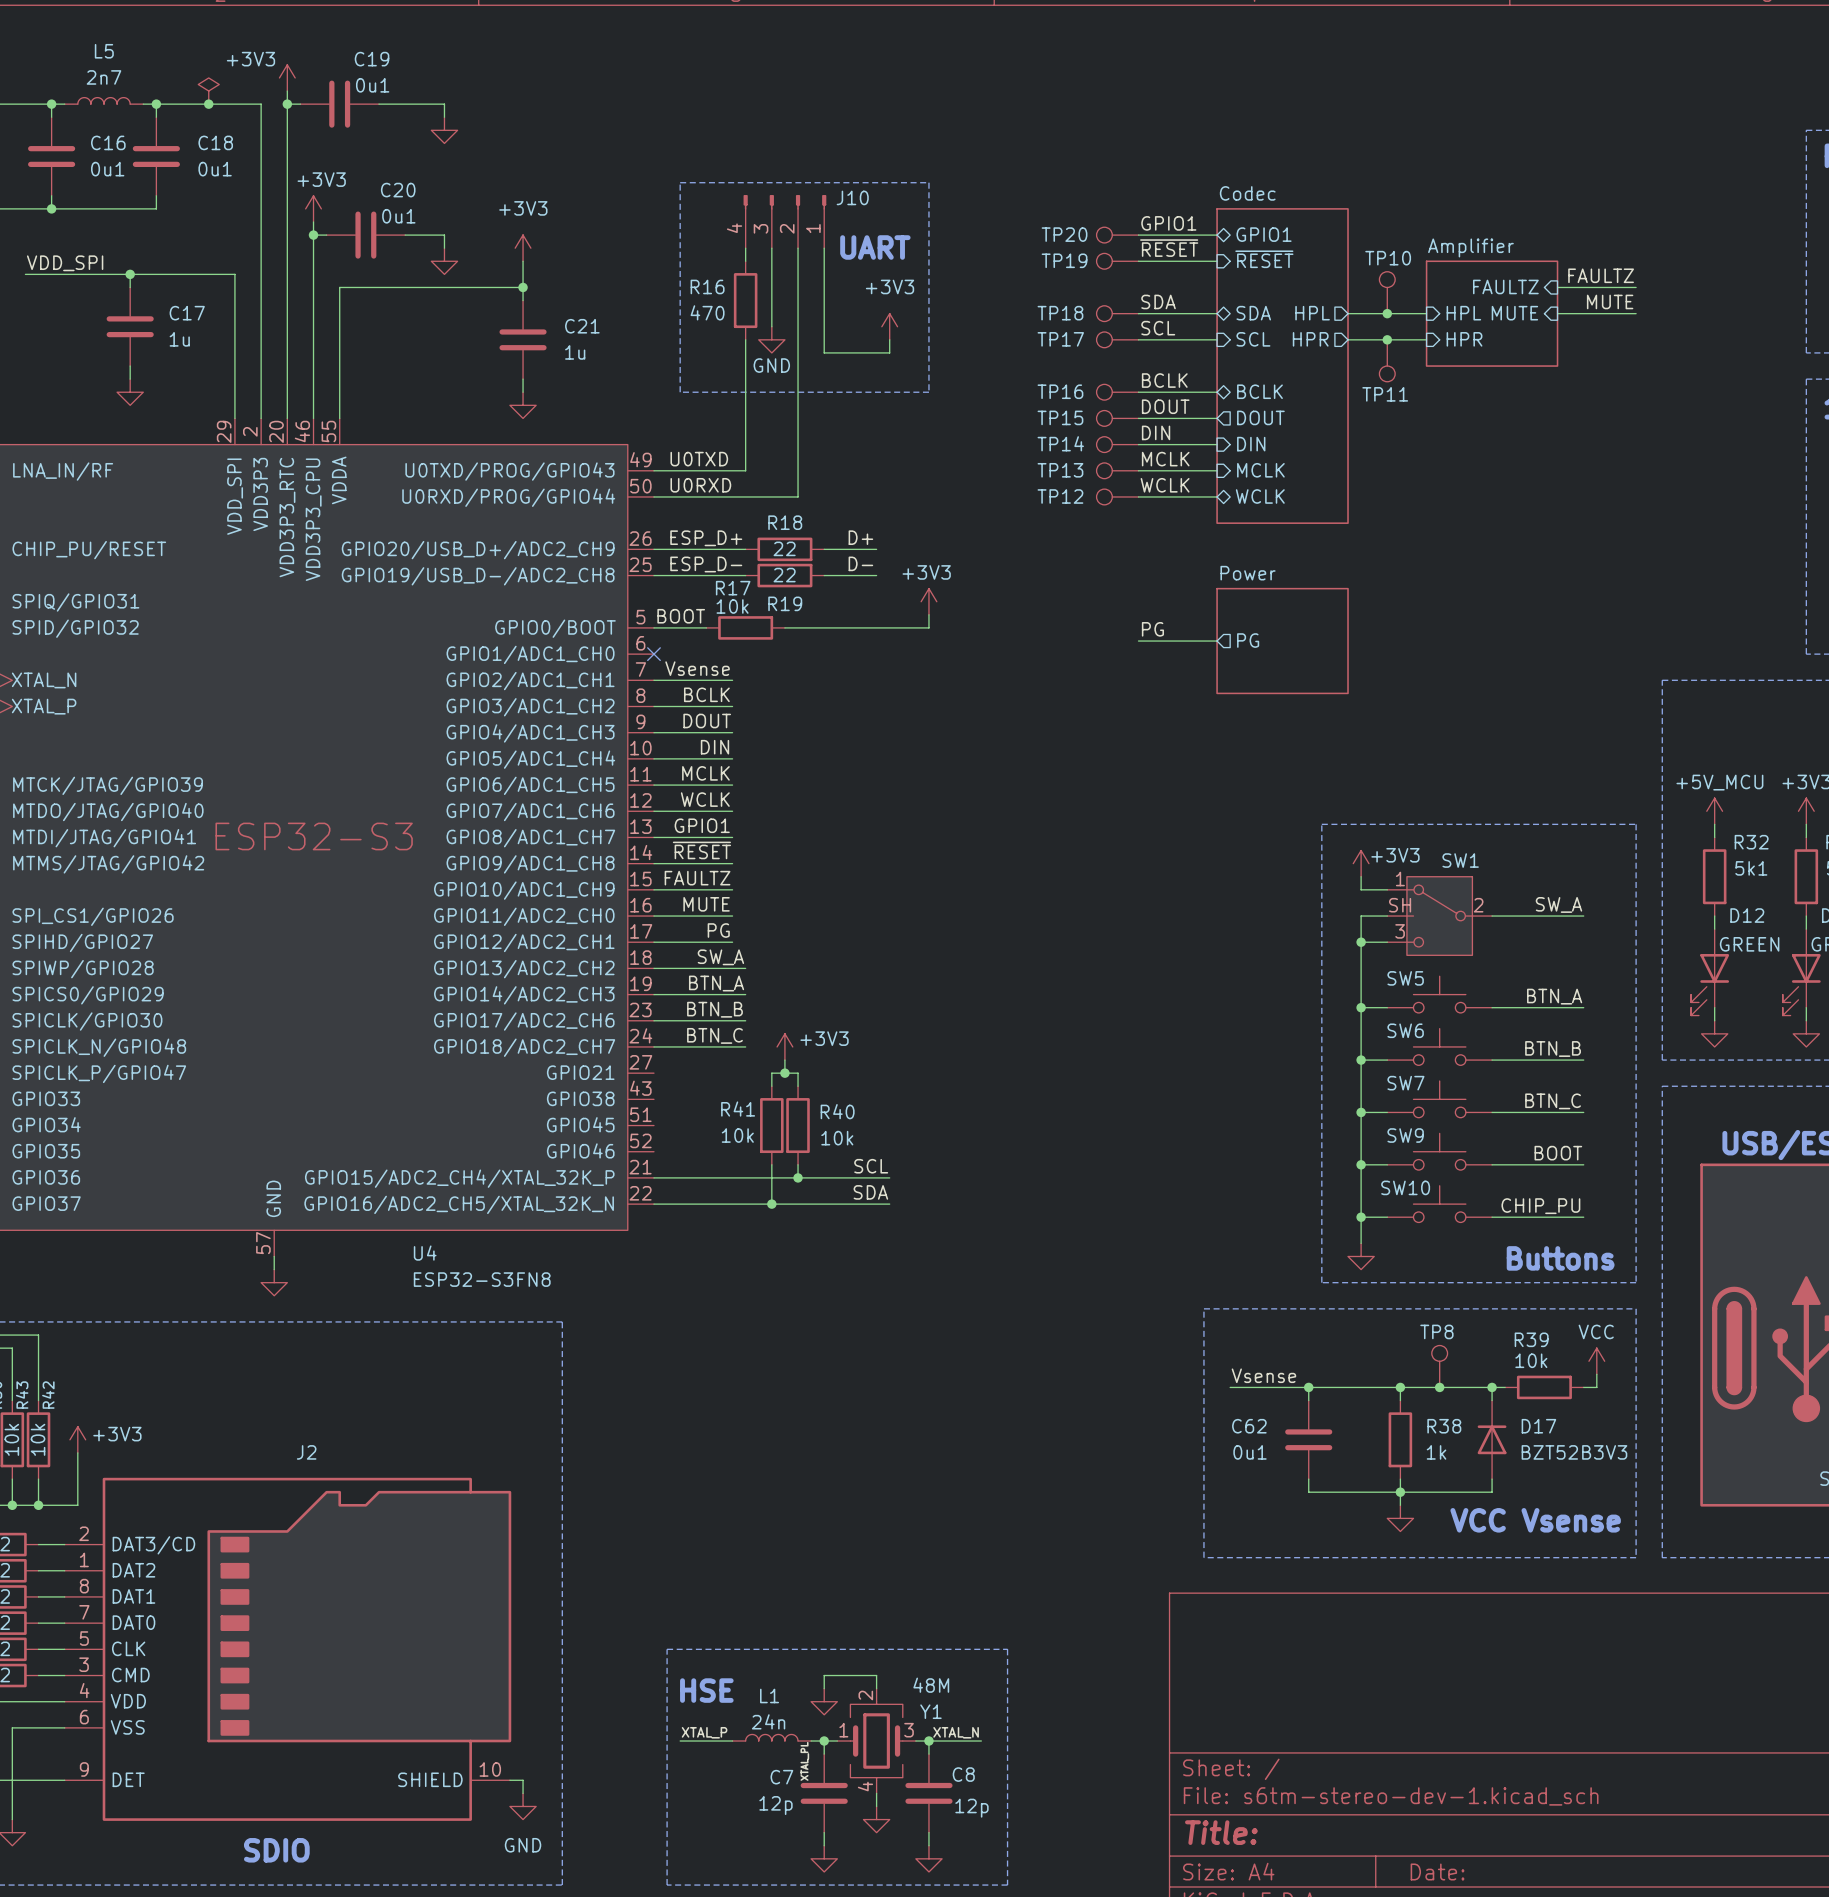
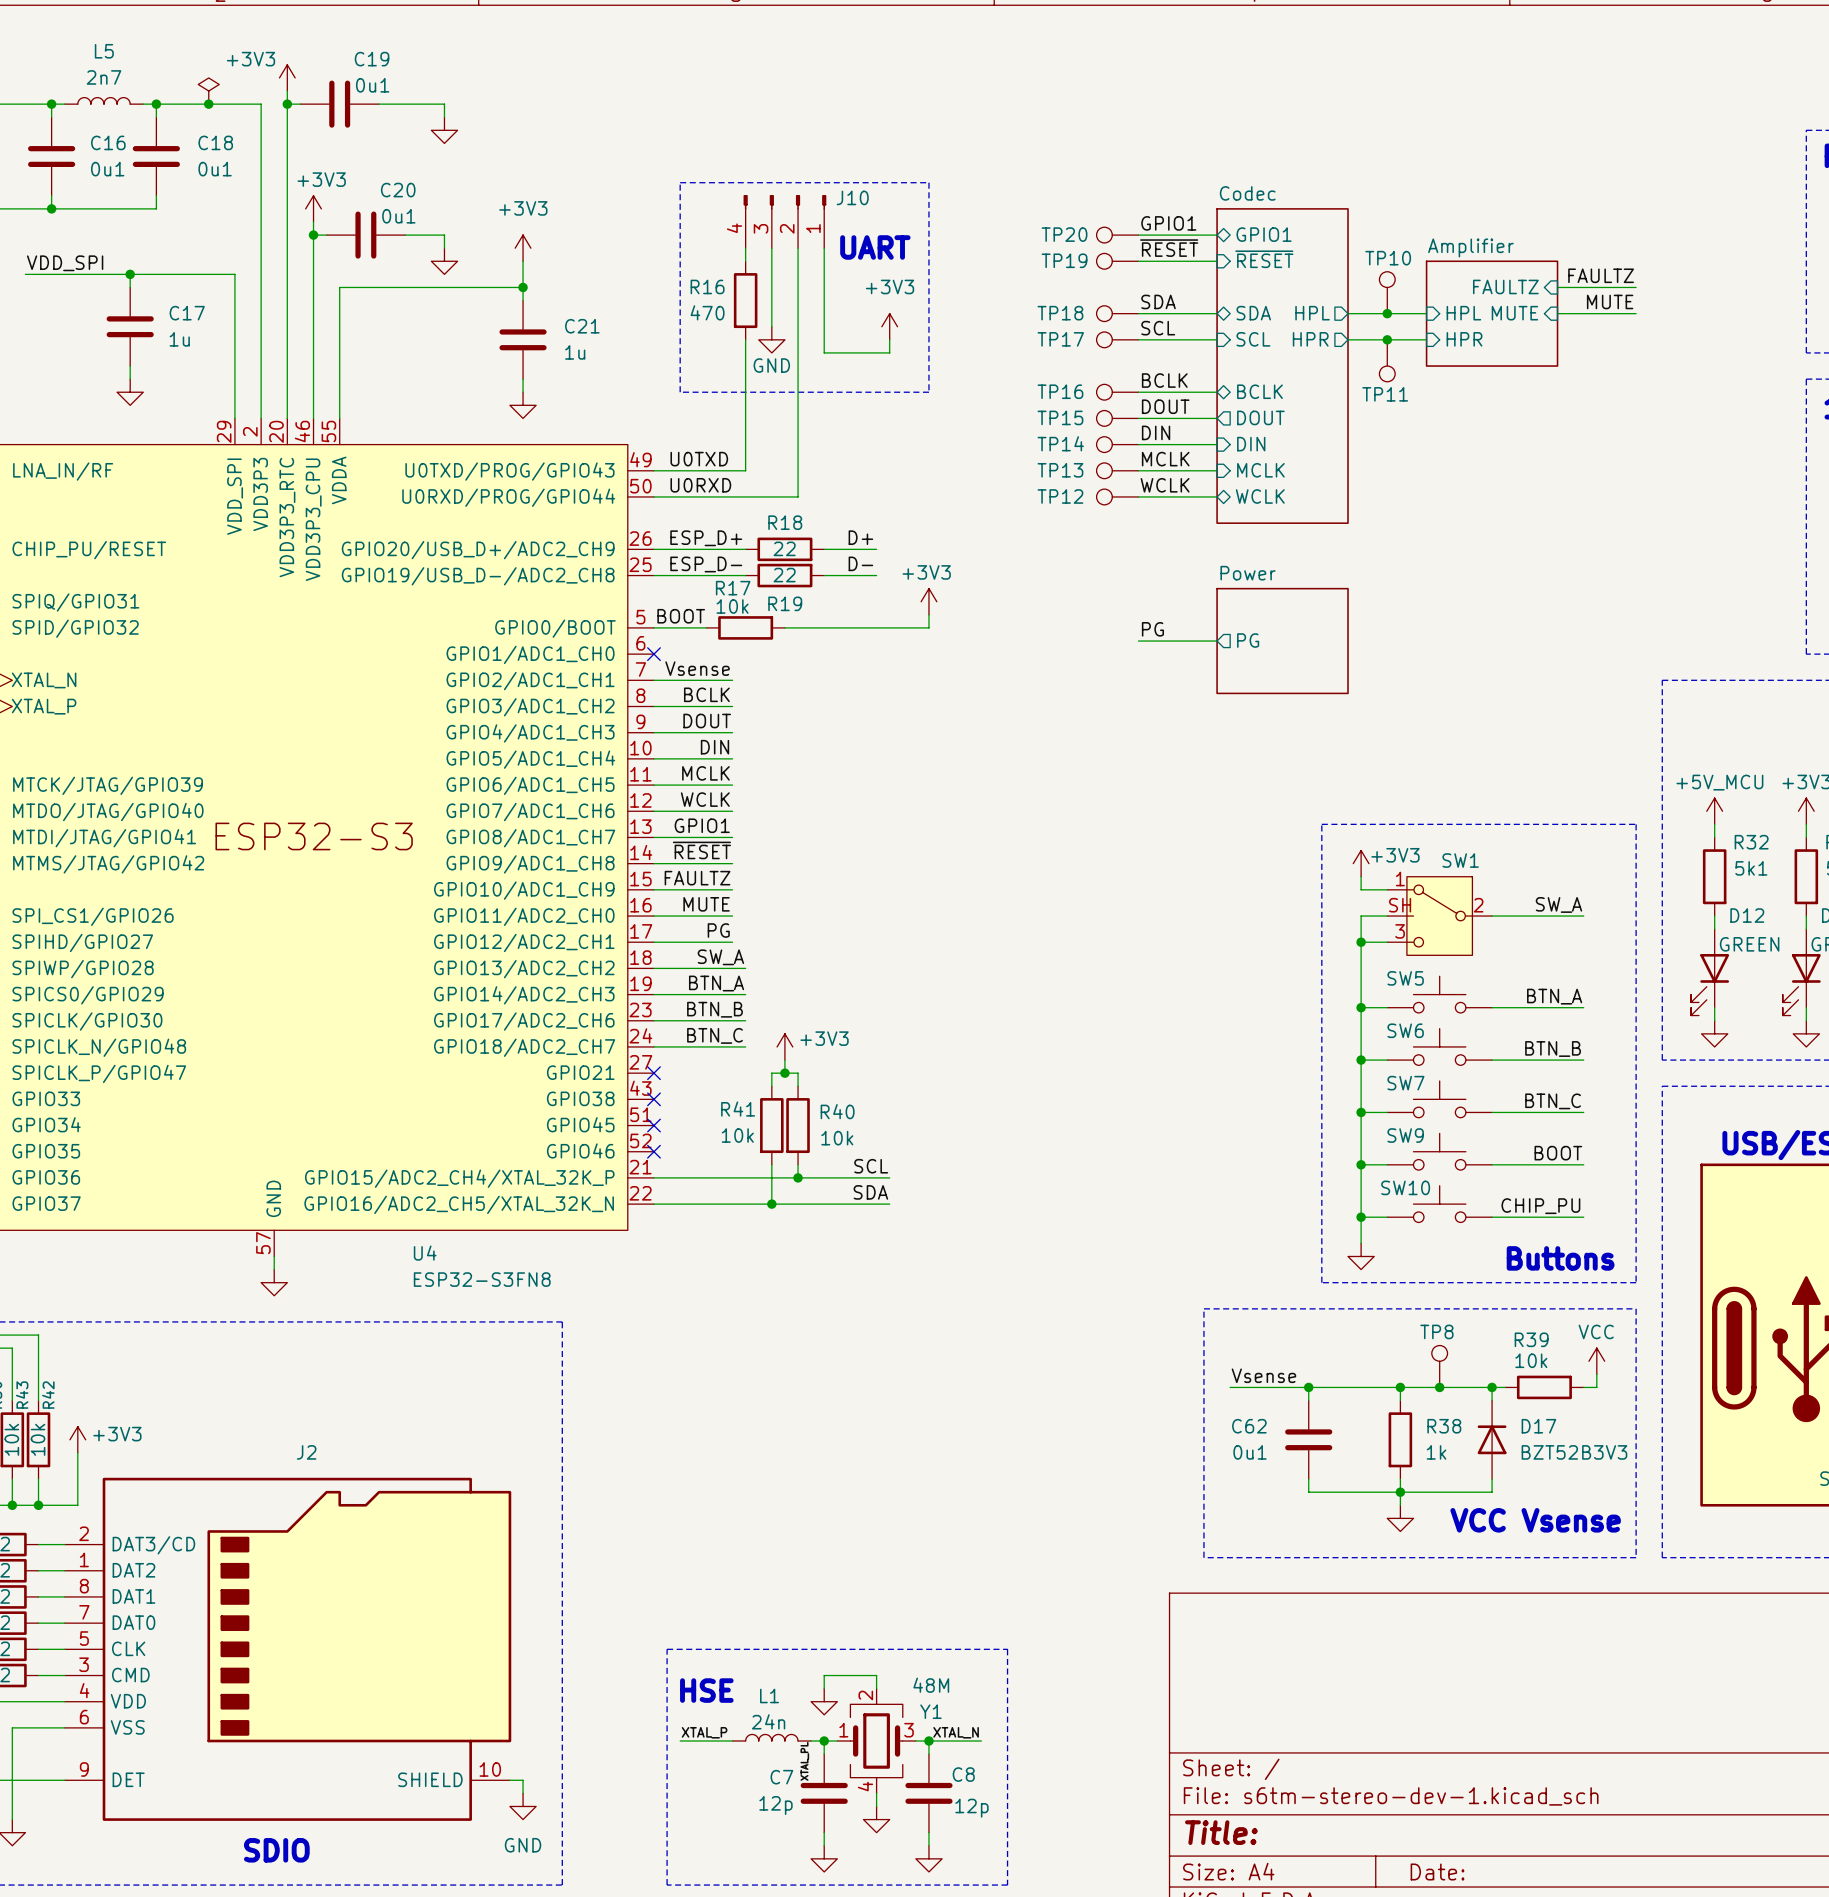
no-connect mark: none -> (653, 1073)
no-connect mark: none -> (653, 1099)
no-connect mark: none -> (653, 1125)
no-connect mark: none -> (653, 1151)

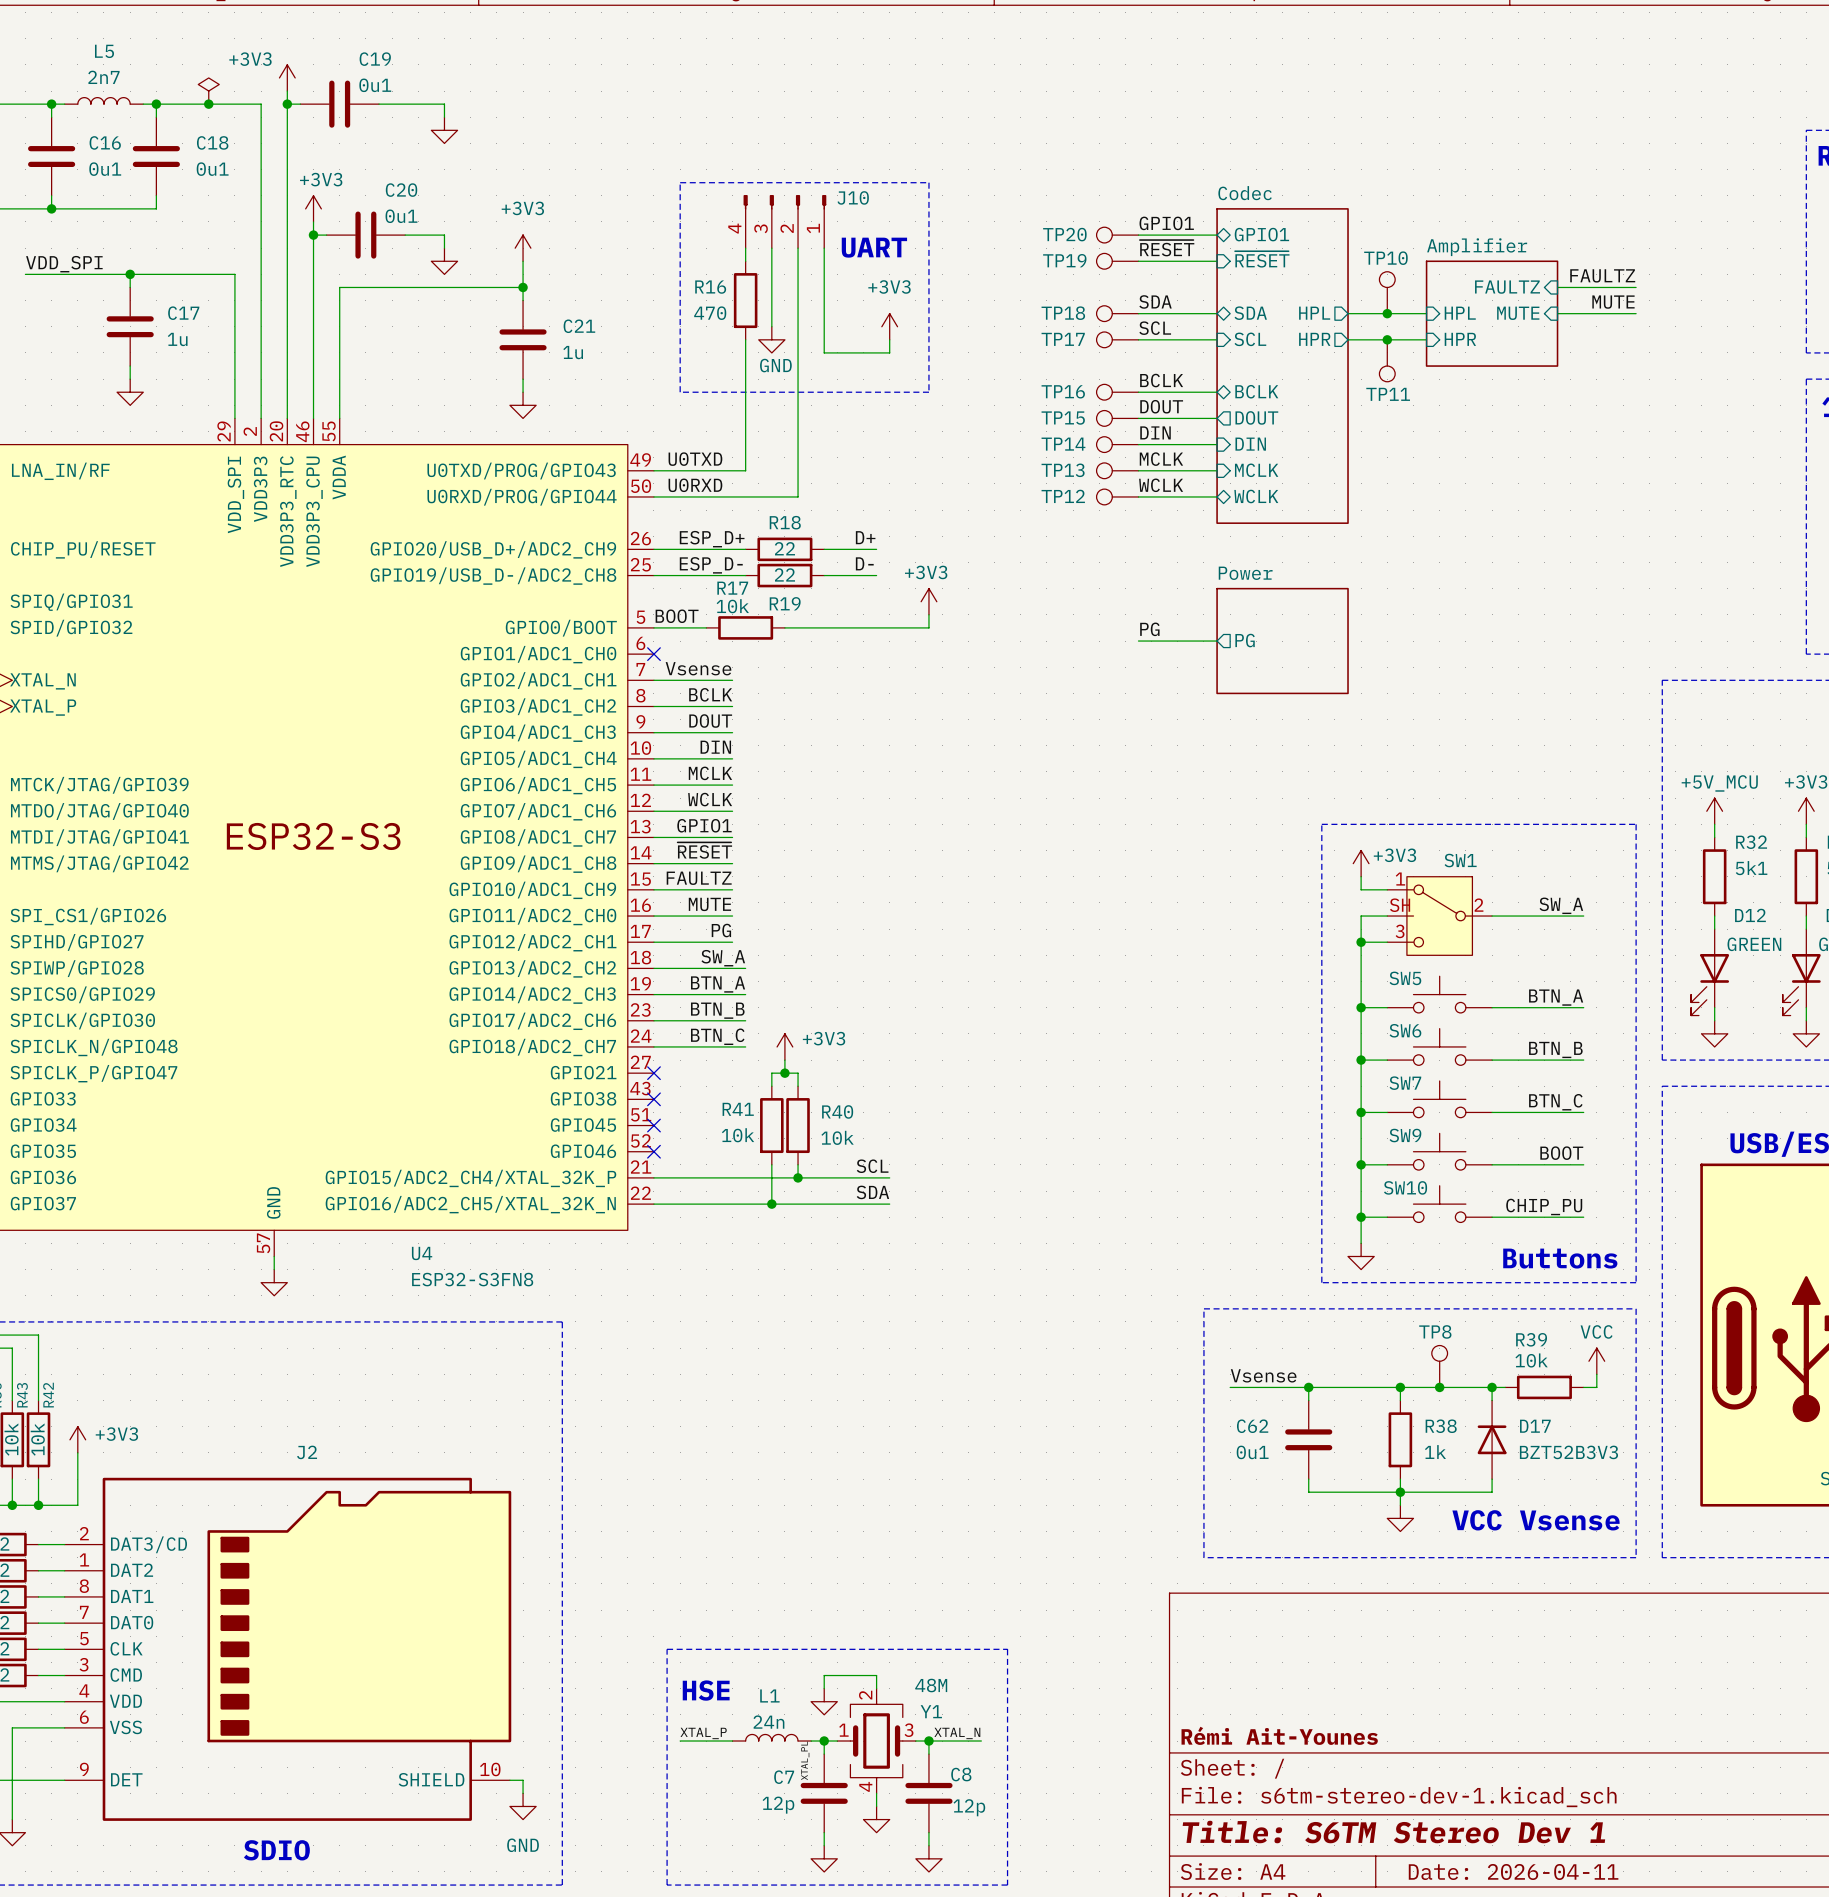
title block: none -> Rémi Ait-Younes (1279, 1735)
title block: Title: (1221, 1832) -> Title: S6TM Stereo Dev 1 (1393, 1832)
title block: Date: (1437, 1871) -> Date: 2026-04-11 (1513, 1871)

